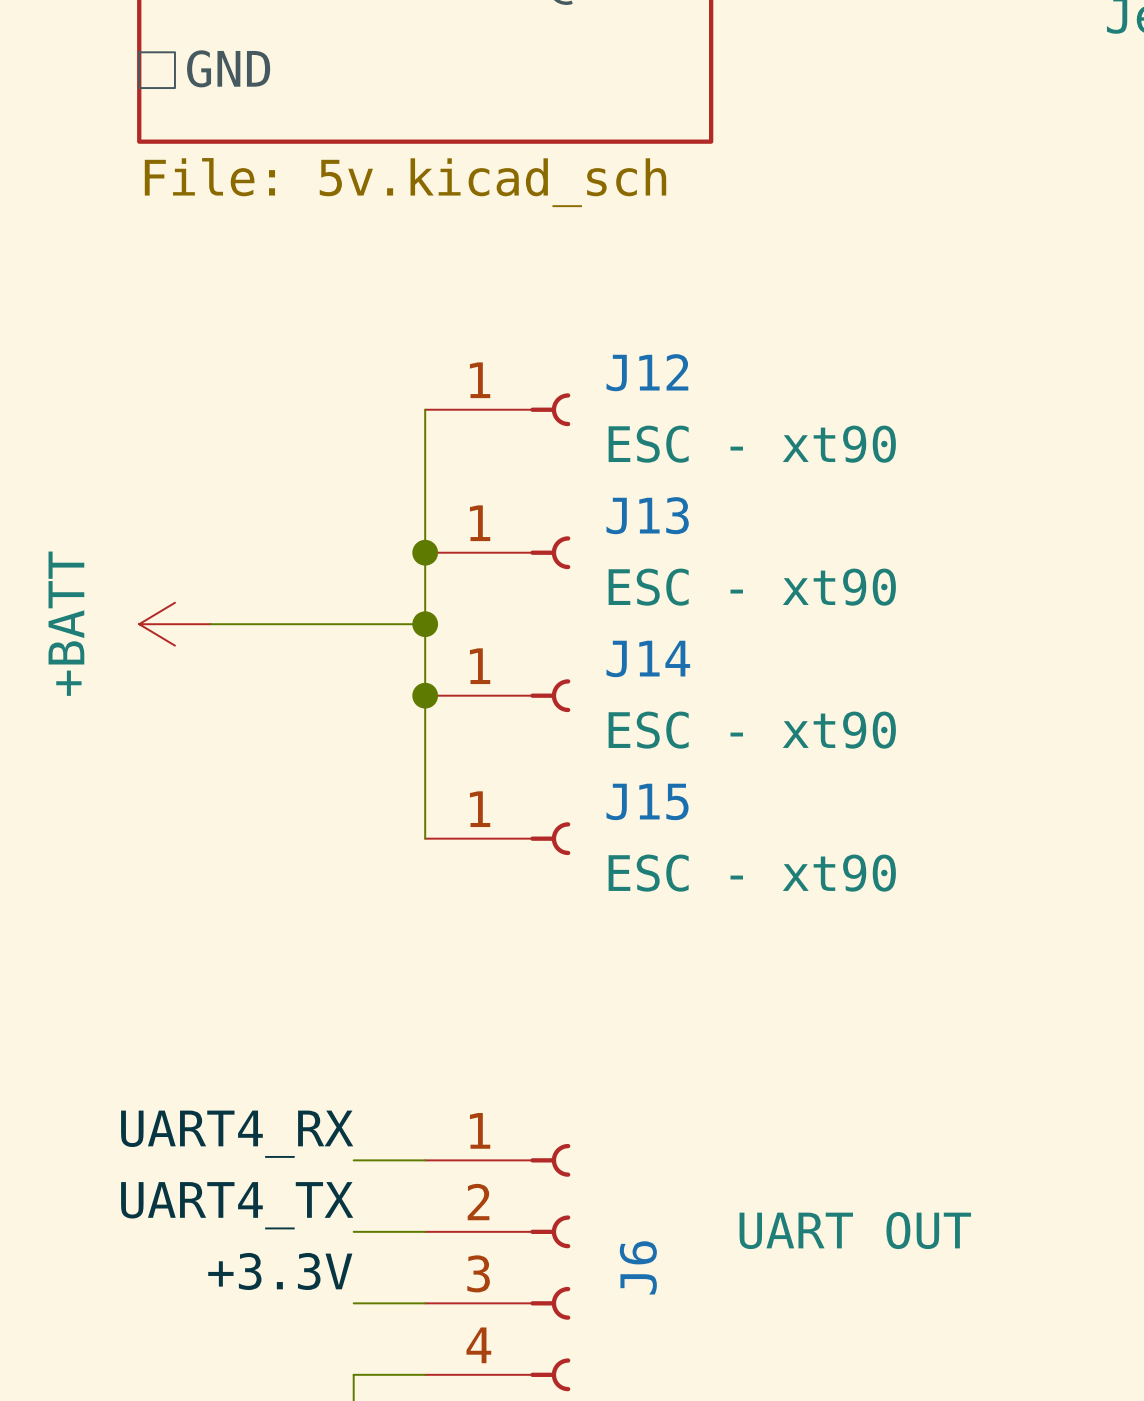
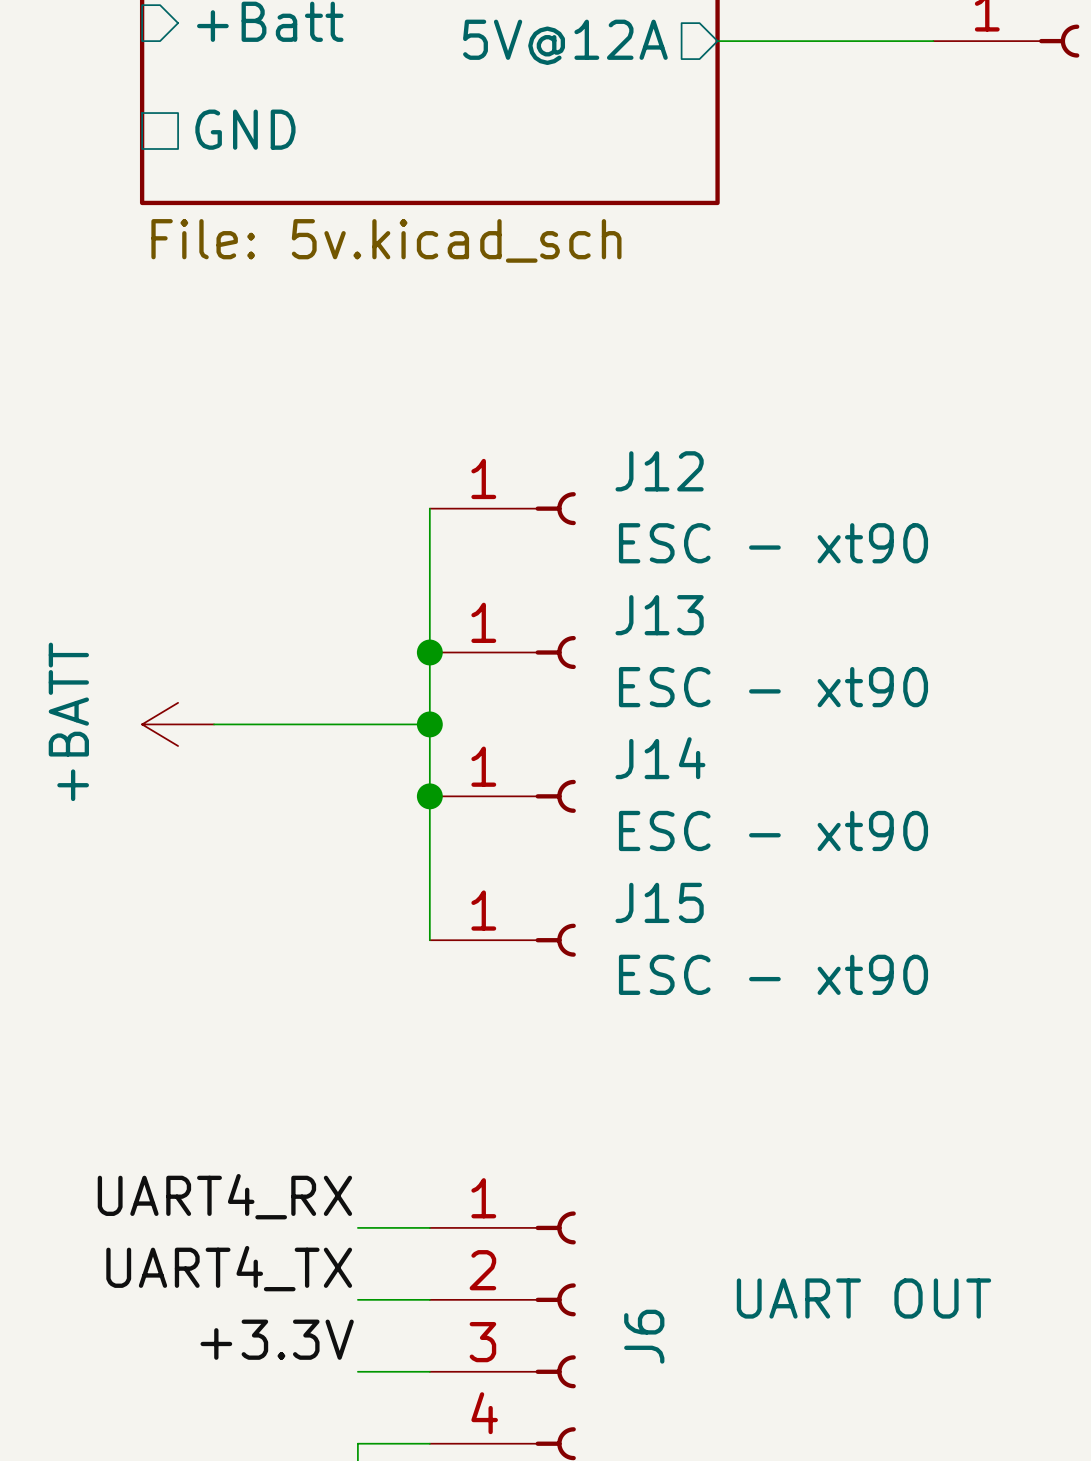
wire: (425, 409) (425, 445) -> (429, 904) (429, 940)
J12 position: (497, 409) -> (502, 508)
junction: (425, 552) -> none
J13 position: (497, 552) -> (502, 652)
junction: none -> (429, 652)
power symbol position: +BATT (174, 624) -> +BATT (178, 724)
wire: (210, 624) (425, 624) -> (214, 724) (429, 724)
junction: (425, 624) -> none
junction: none -> (429, 724)
junction: (425, 695) -> none
J14 position: (497, 695) -> (502, 796)
junction: none -> (429, 796)
J15 position: (497, 838) -> (502, 940)

